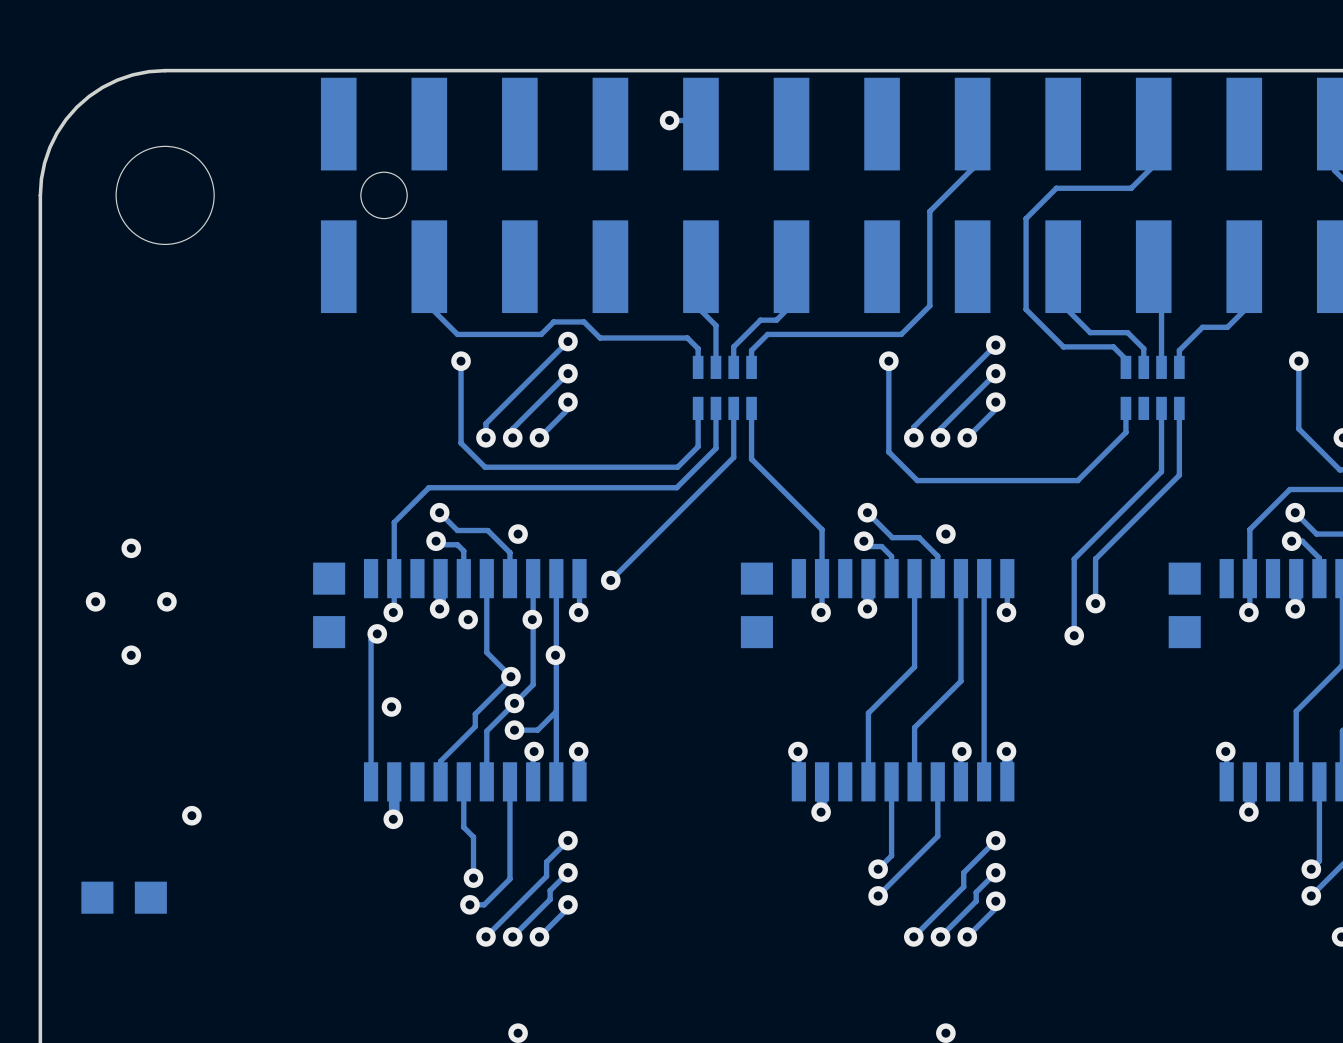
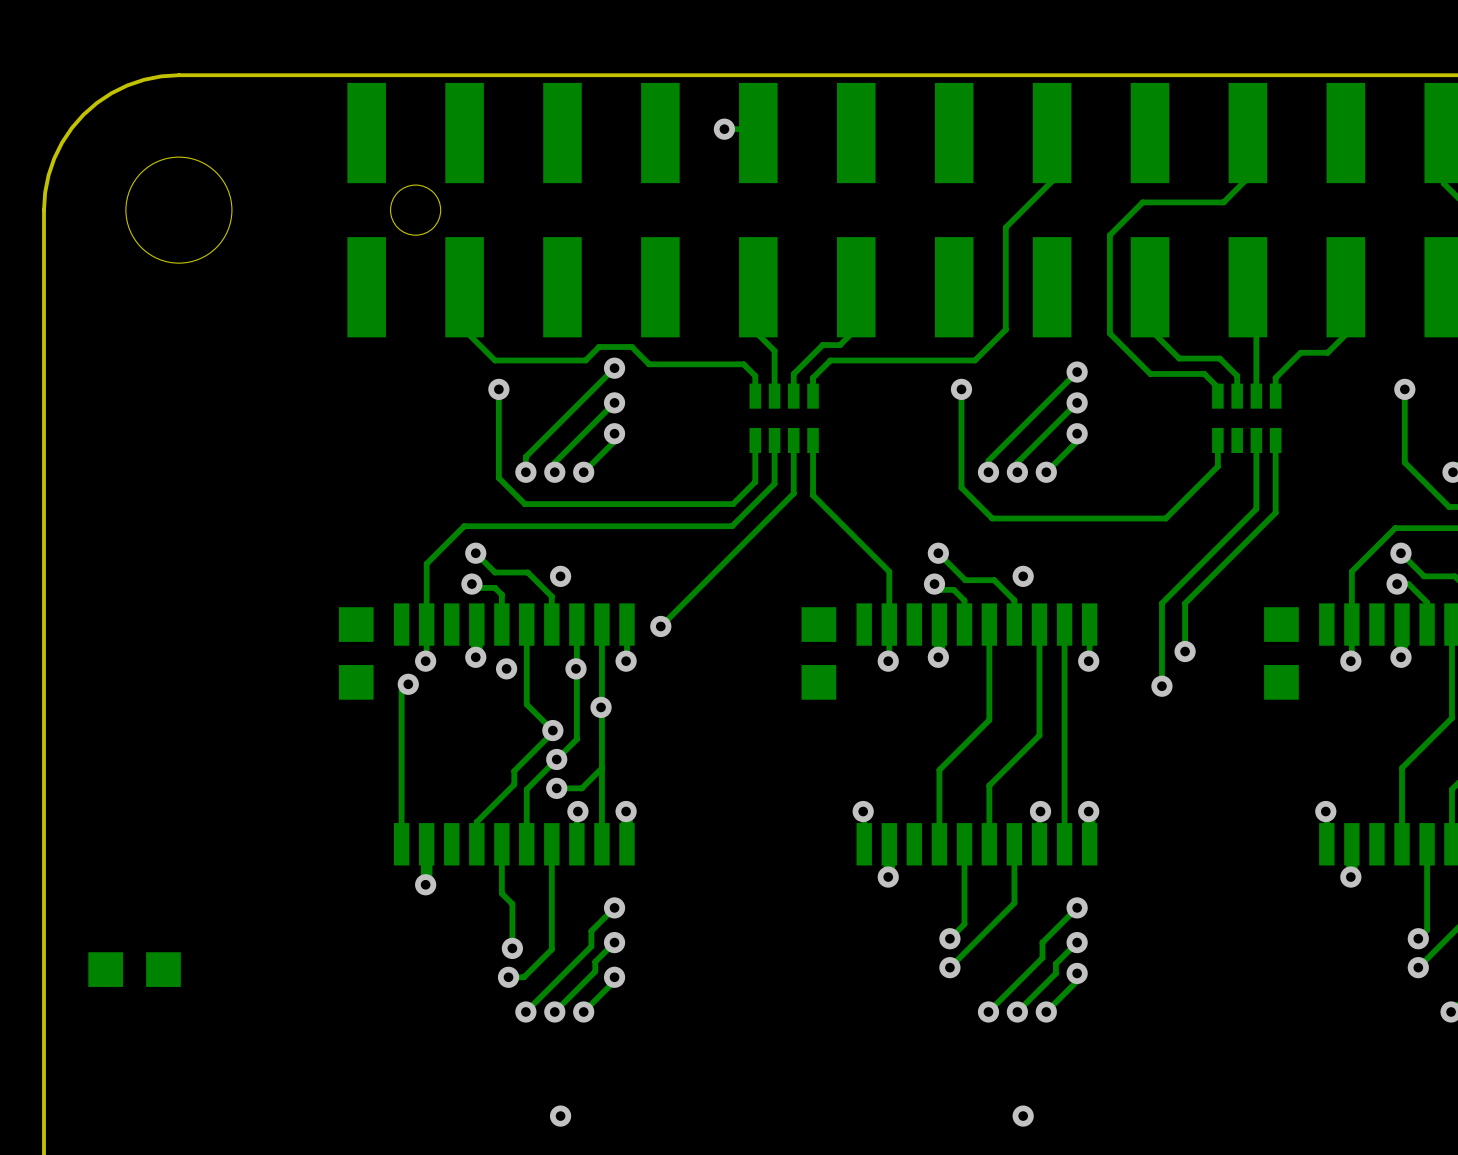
via: (131, 548) -> none
via: (95, 601) -> none
via: (166, 601) -> none
via: (131, 655) -> none
via: (391, 706) -> none
via: (191, 815) -> none

